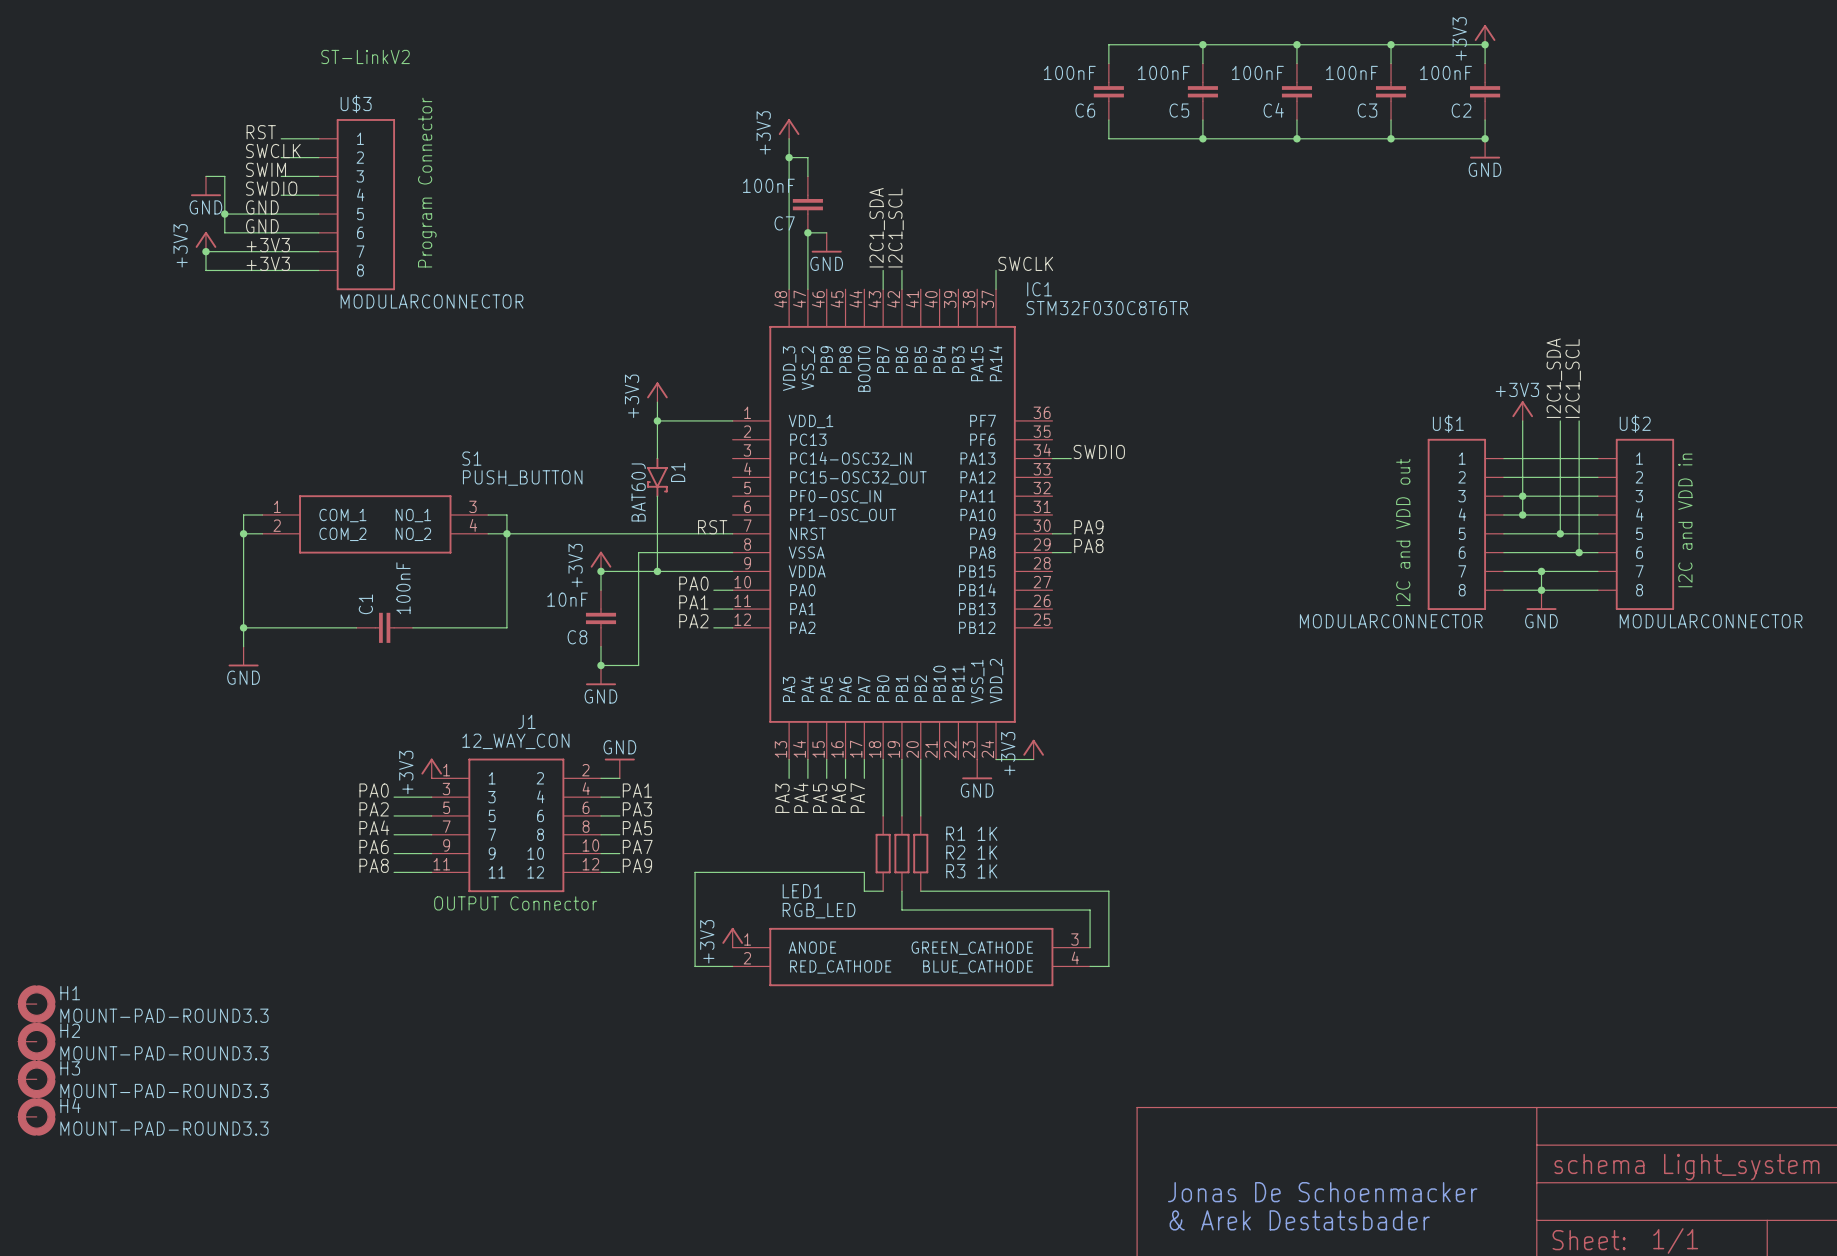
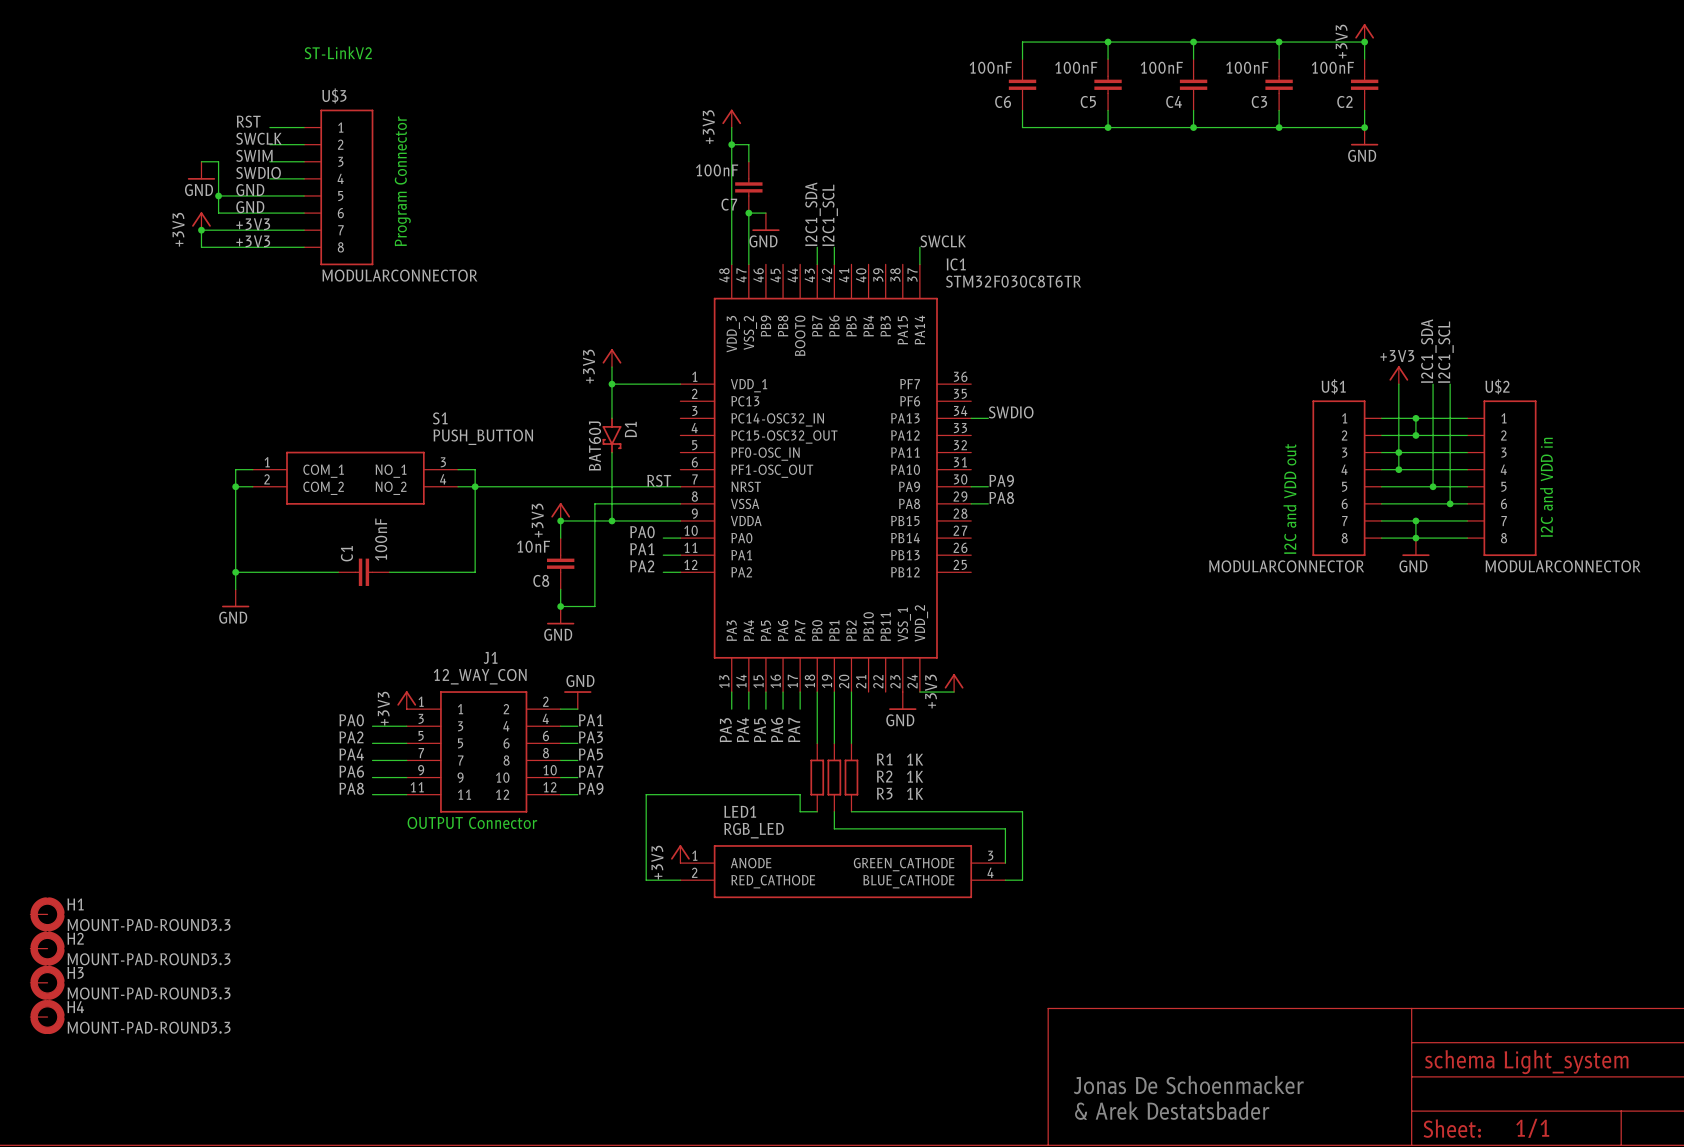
wire: none -> (1415, 418) (1415, 435)
junction: none -> (1415, 418)
junction: none -> (1415, 435)

